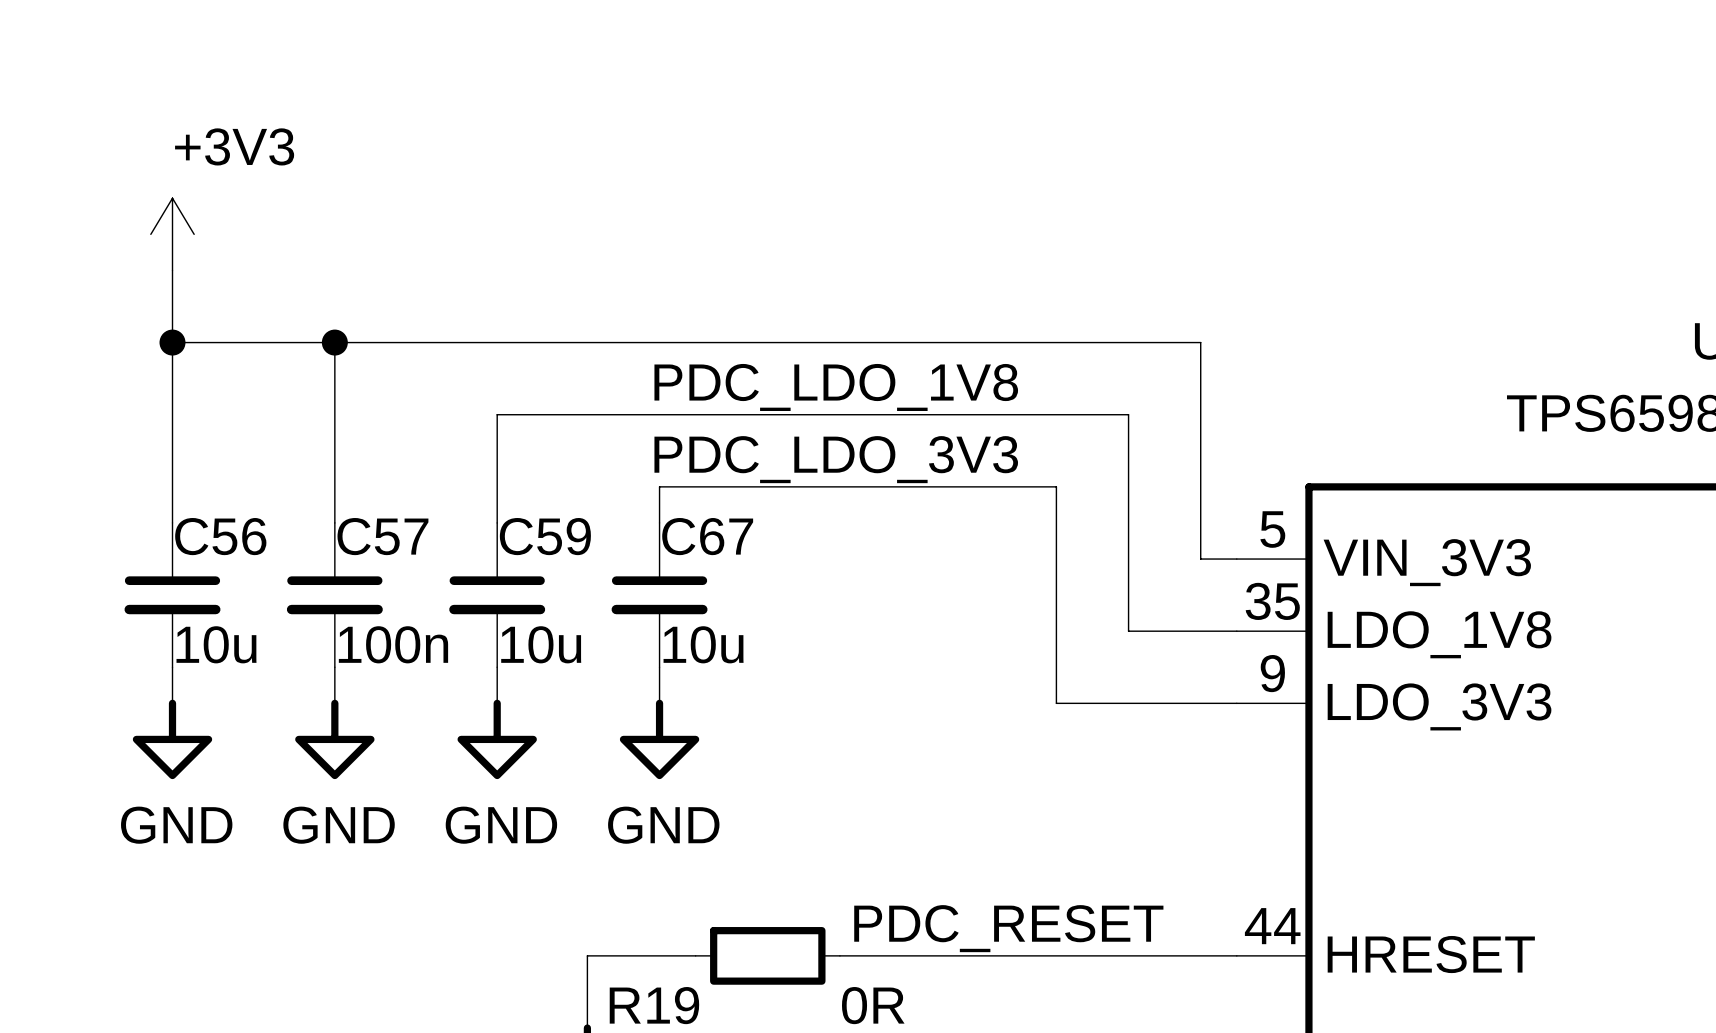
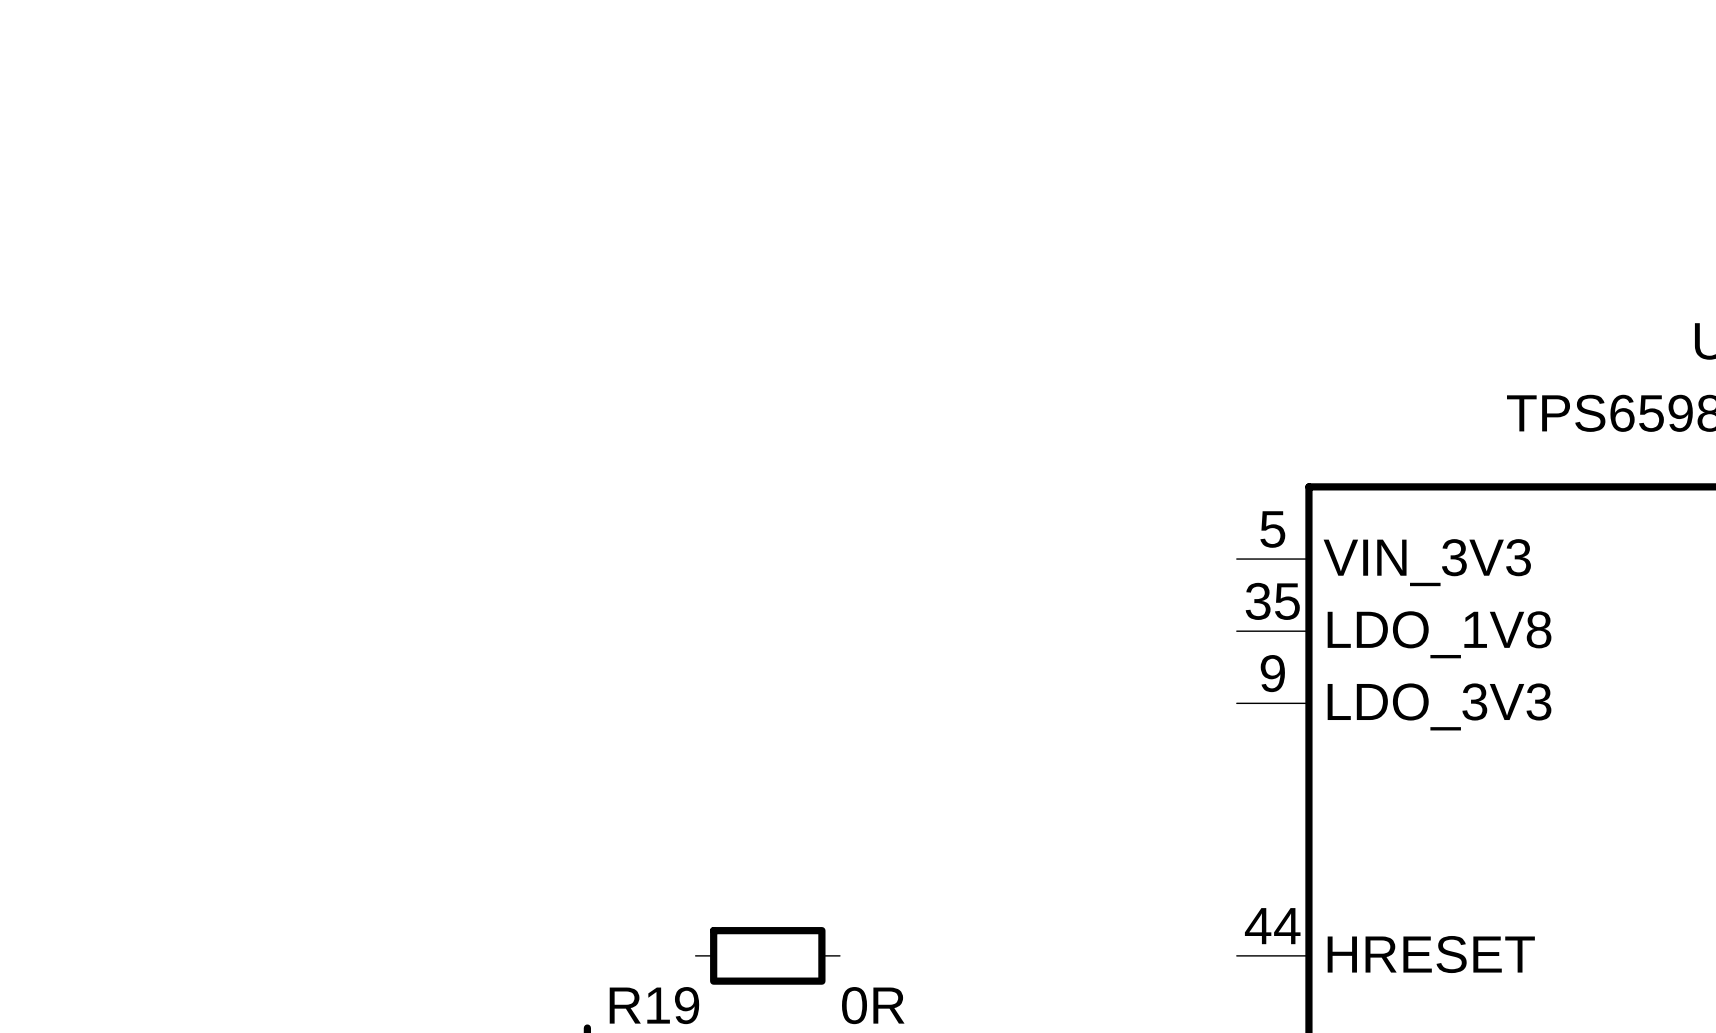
power symbol: +3V3 (172, 234) -> none
wire: (172, 270) (172, 522) -> none
wire: (172, 342) (1200, 342) (1200, 559) (1236, 559) -> none
junction: (172, 342) -> none
wire: (334, 342) (334, 522) -> none
junction: (334, 342) -> none
label: PDC_LDO_1V8 (836, 387) -> none
label: PDC_LDO_3V3 (836, 459) -> none
wire: (497, 522) (497, 414) (1128, 414) (1128, 631) (1236, 631) -> none
wire: (659, 522) (659, 486) (1056, 486) (1056, 703) (1236, 703) -> none
C56: (172, 595) -> none
C57: (334, 595) -> none
C59: (497, 595) -> none
C67: (659, 595) -> none
wire: (172, 667) (172, 703) -> none
wire: (334, 667) (334, 703) -> none
wire: (497, 667) (497, 703) -> none
wire: (659, 667) (659, 703) -> none
power symbol: GND (172, 739) -> none
power symbol: GND (334, 739) -> none
power symbol: GND (497, 739) -> none
power symbol: GND (659, 739) -> none
label: PDC_RESET (1008, 928) -> none
wire: (695, 955) (587, 955) (587, 1028) -> none
wire: (839, 955) (1236, 955) -> none

